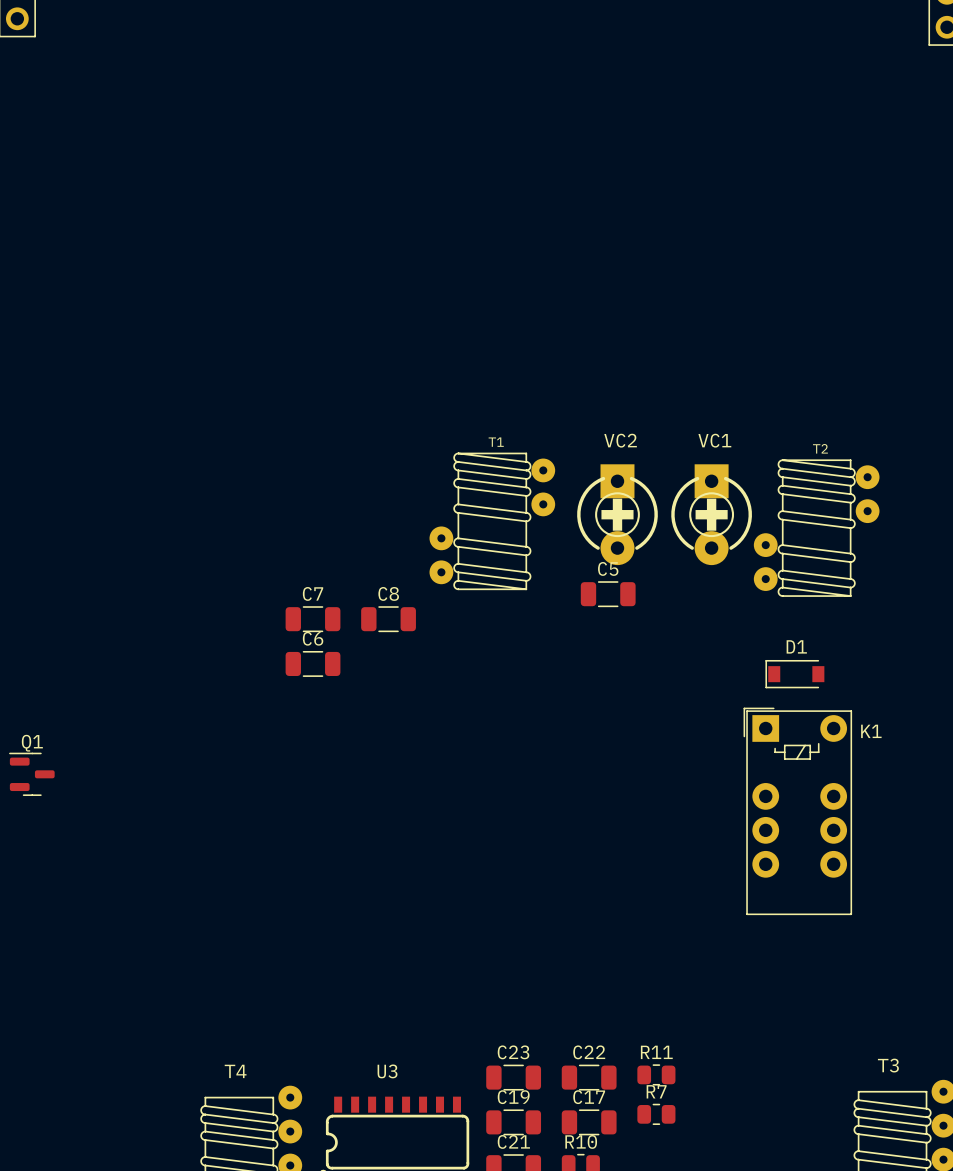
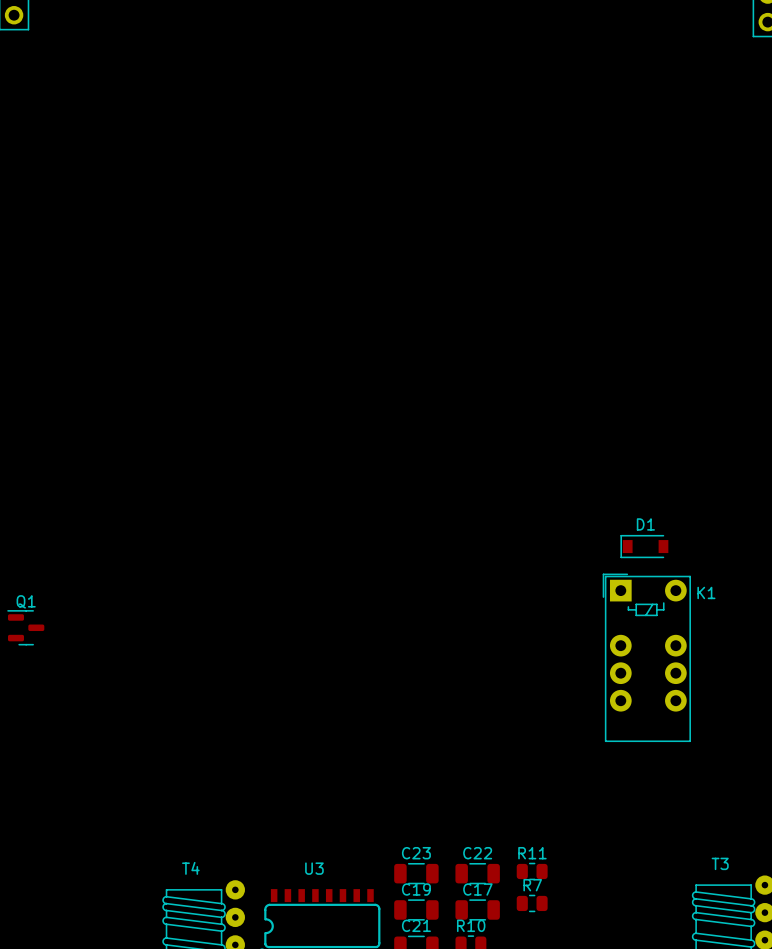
VC2: (617, 514) -> none
VC1: (711, 514) -> none
T1: (492, 521) -> none
T2: (816, 528) -> none
C5: (608, 594) -> none
C7: (313, 619) -> none
C8: (388, 619) -> none
C6: (313, 663) -> none

